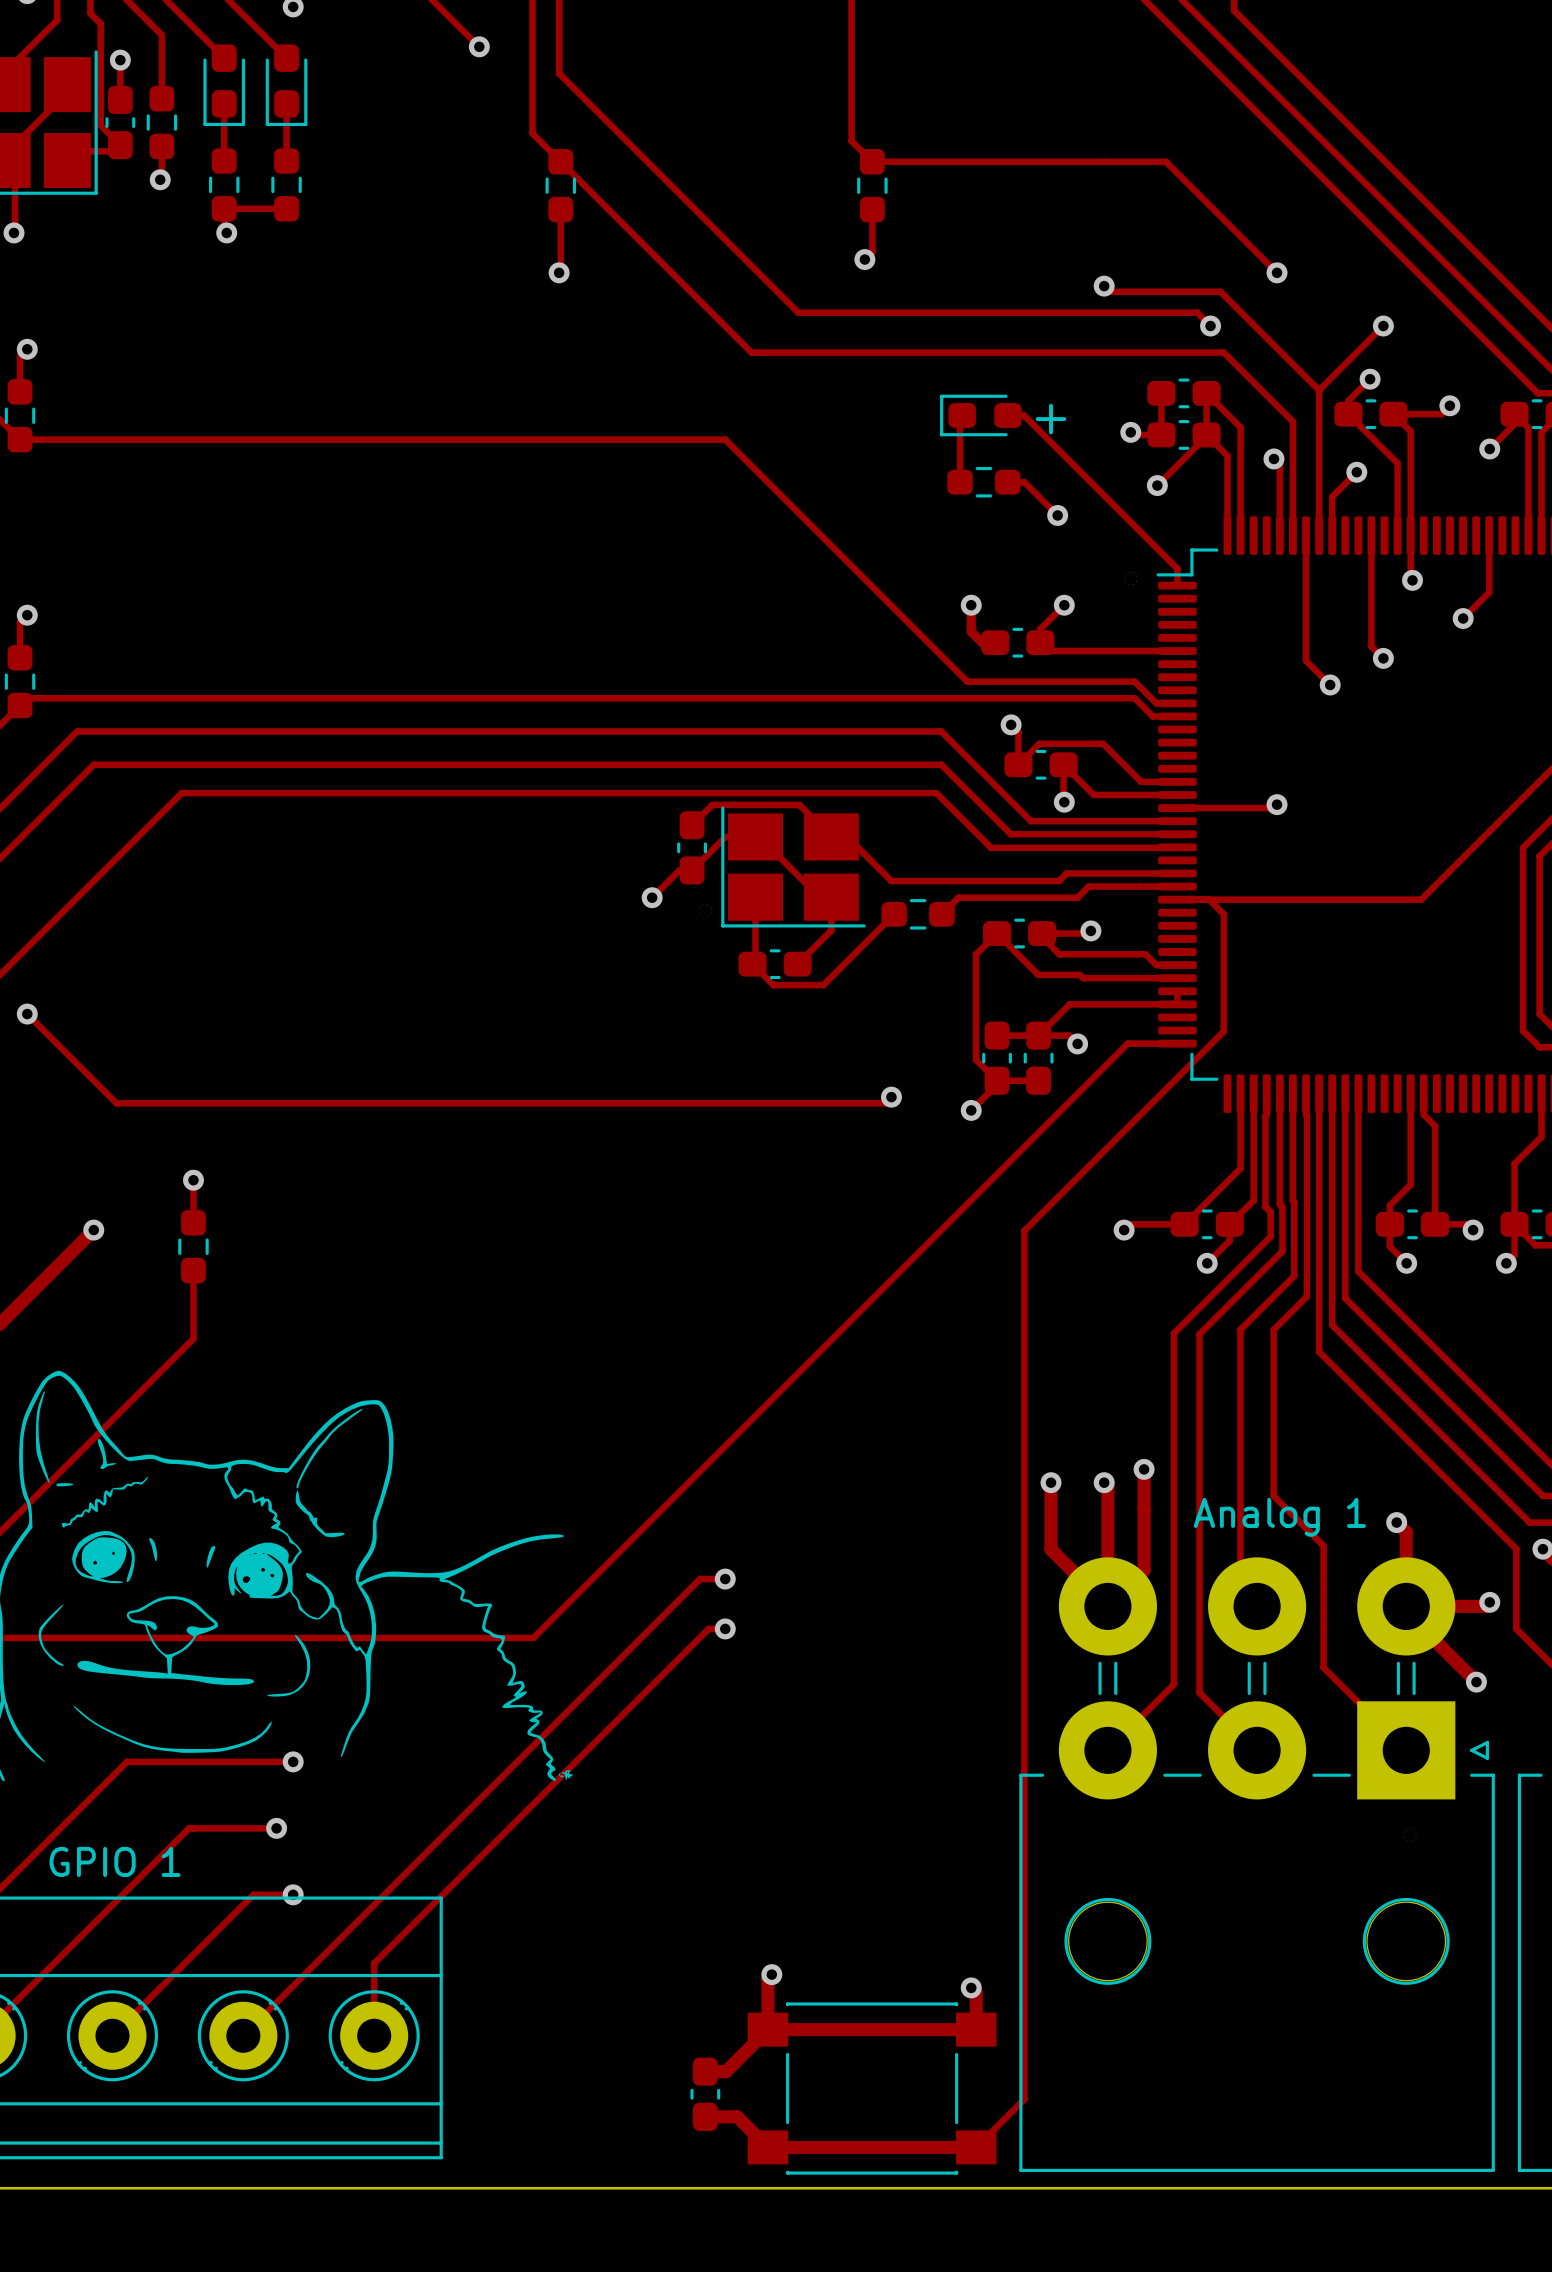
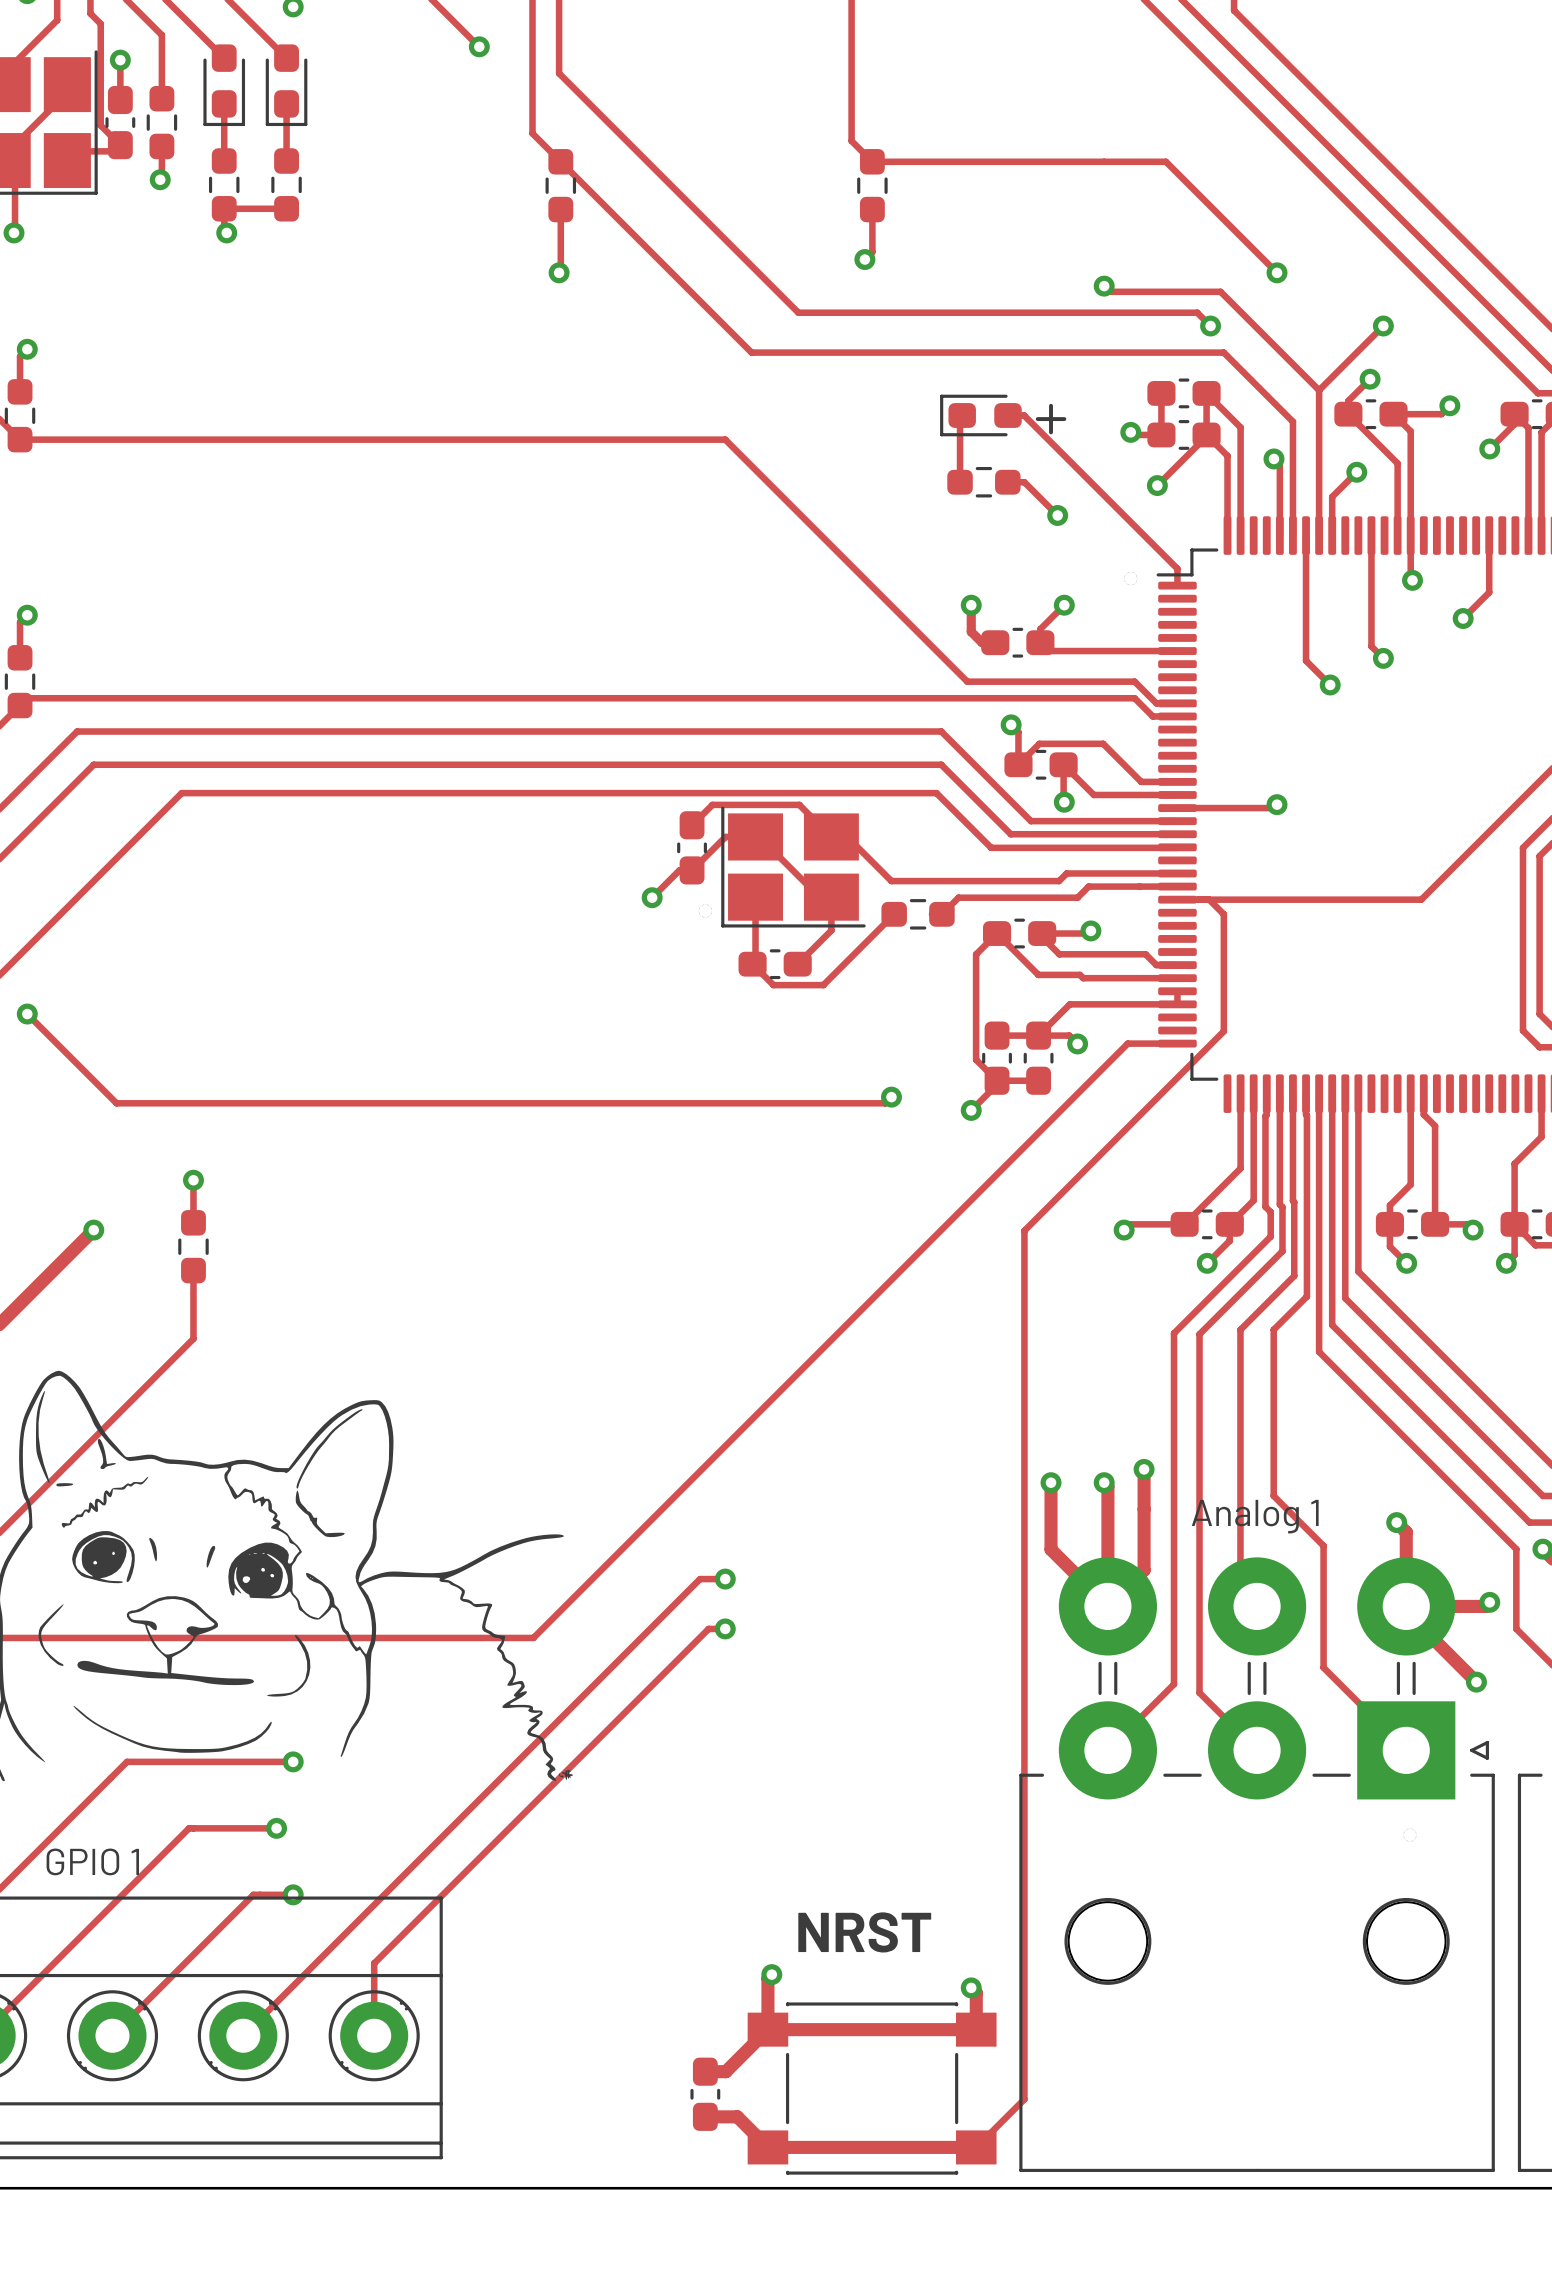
text: none -> NRST (864, 1932)

